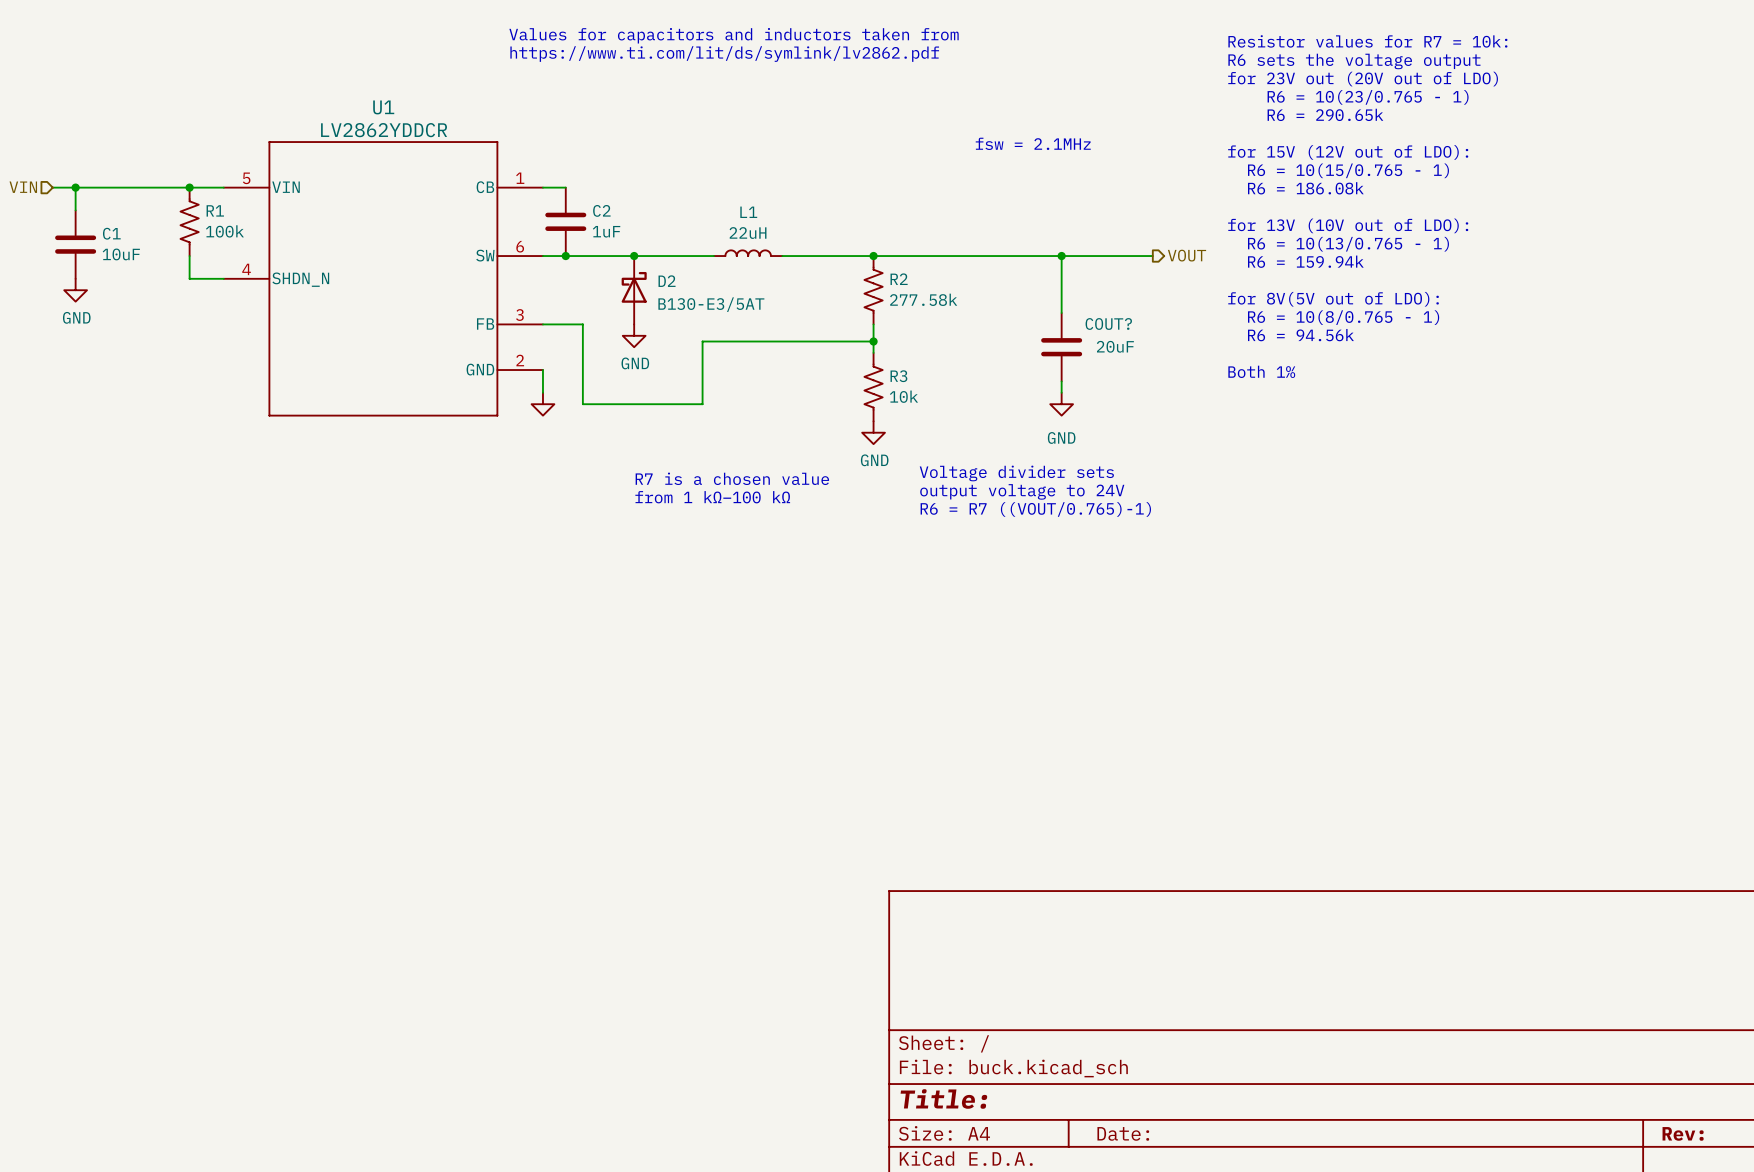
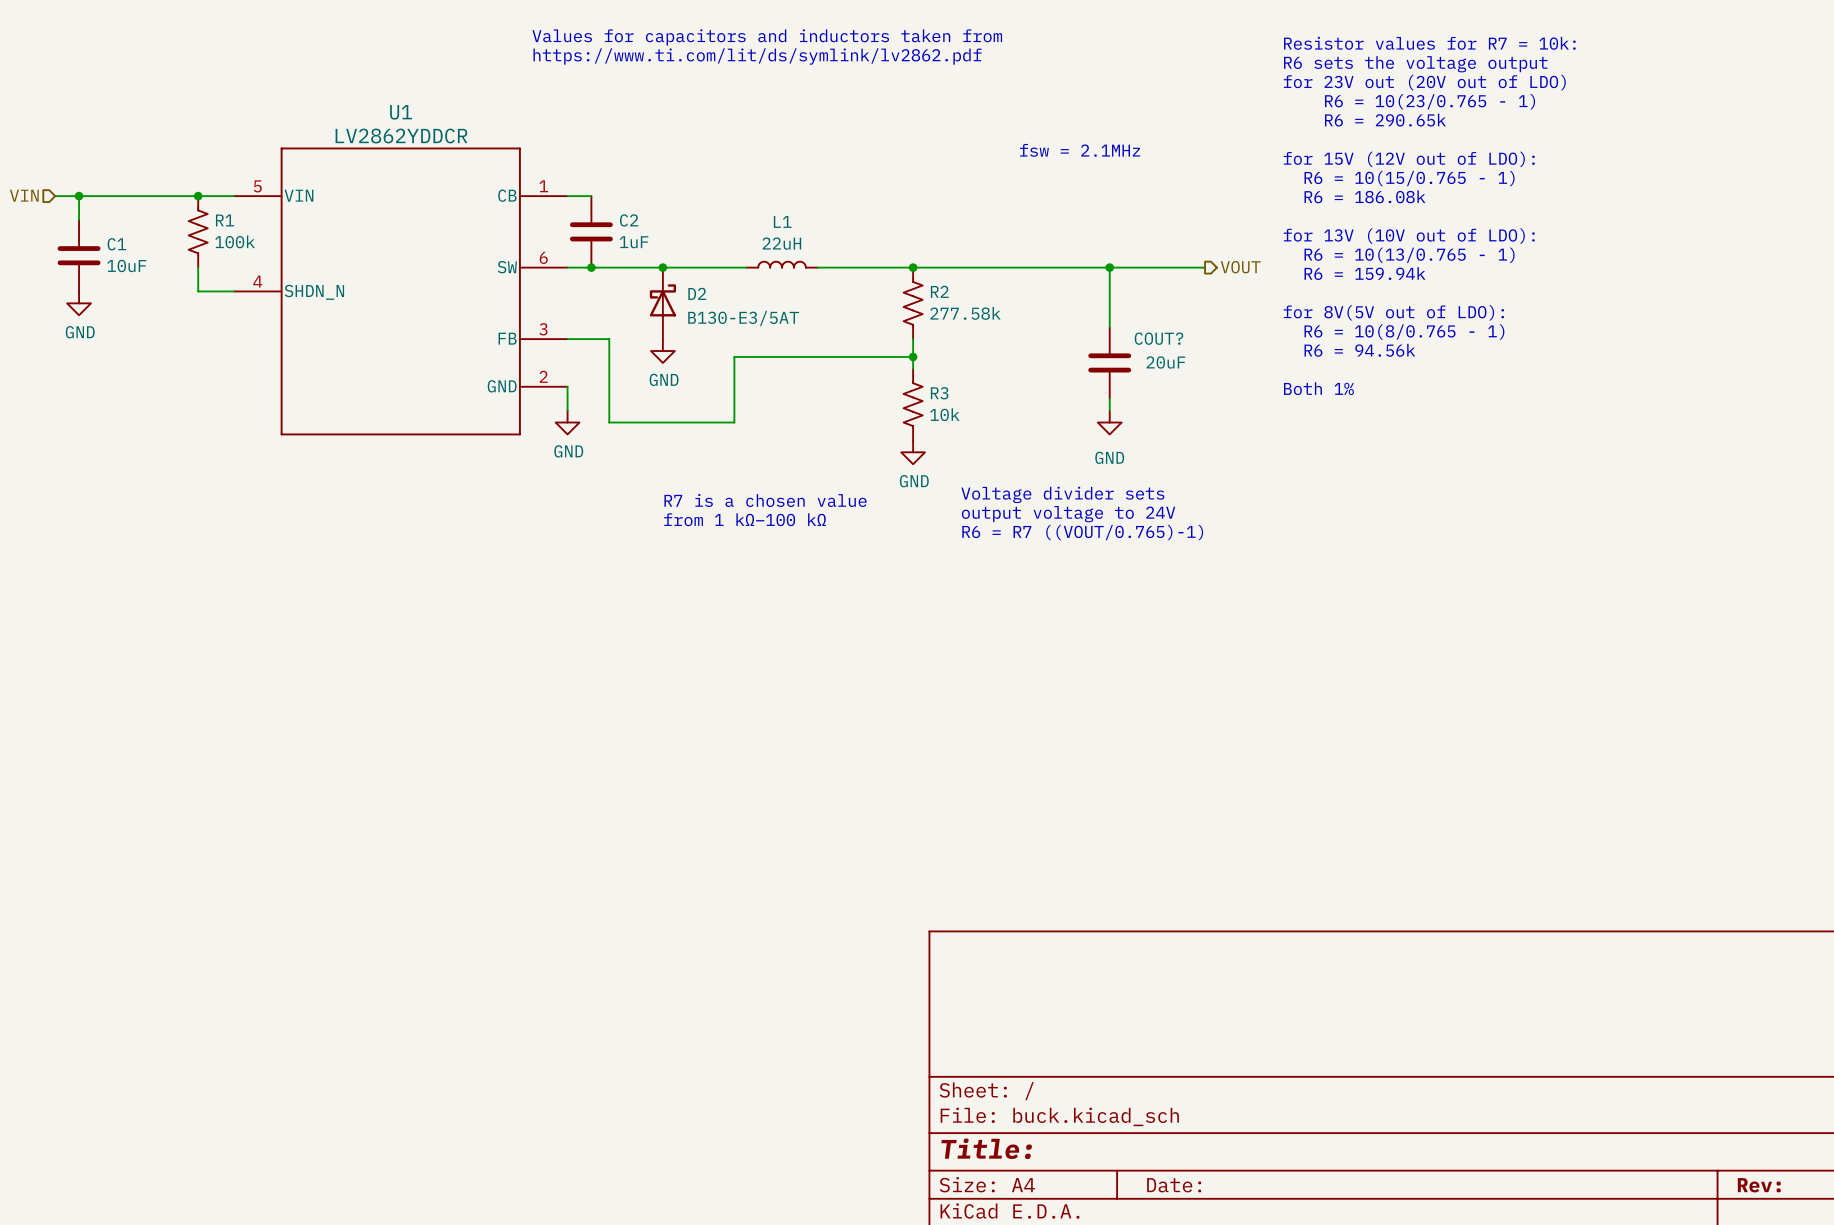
power symbol text: none -> GND (568, 451)

